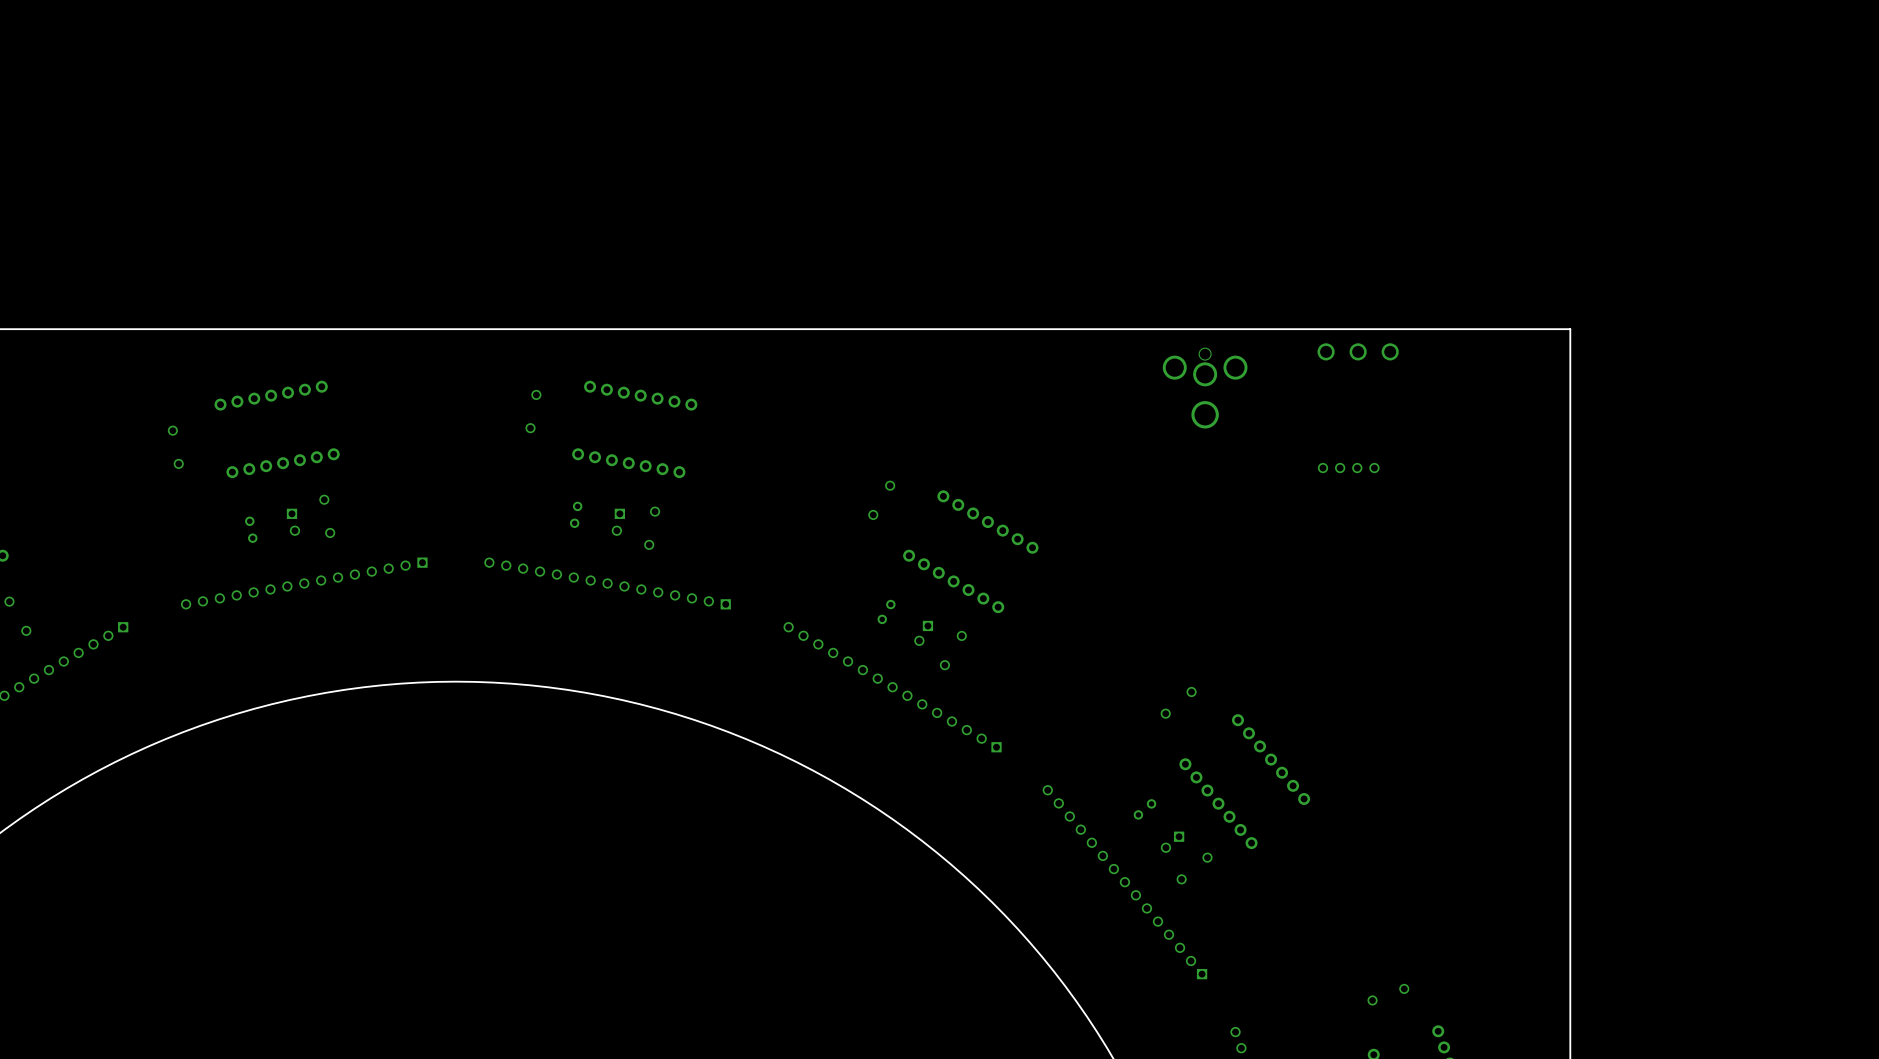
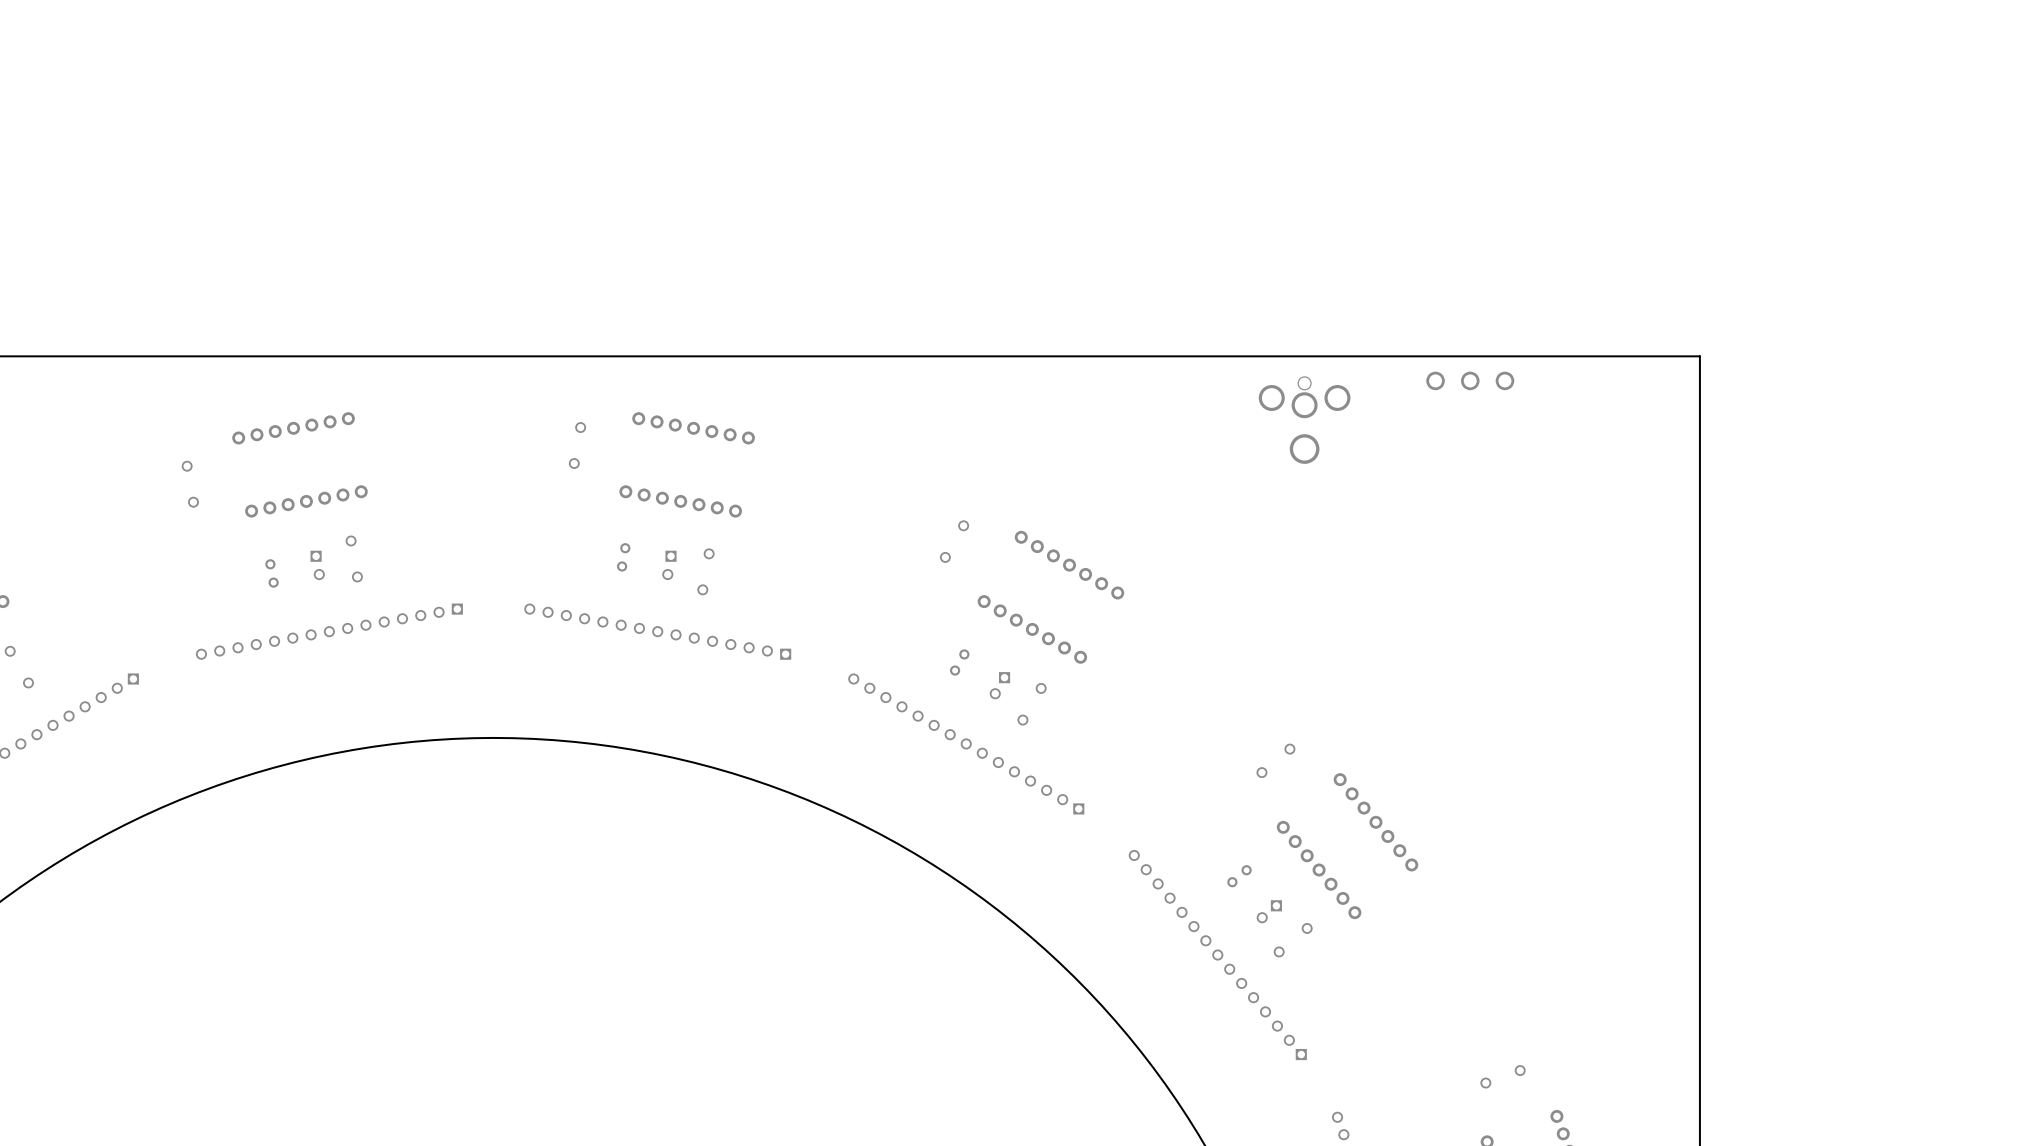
part: (1348, 468) -> none

